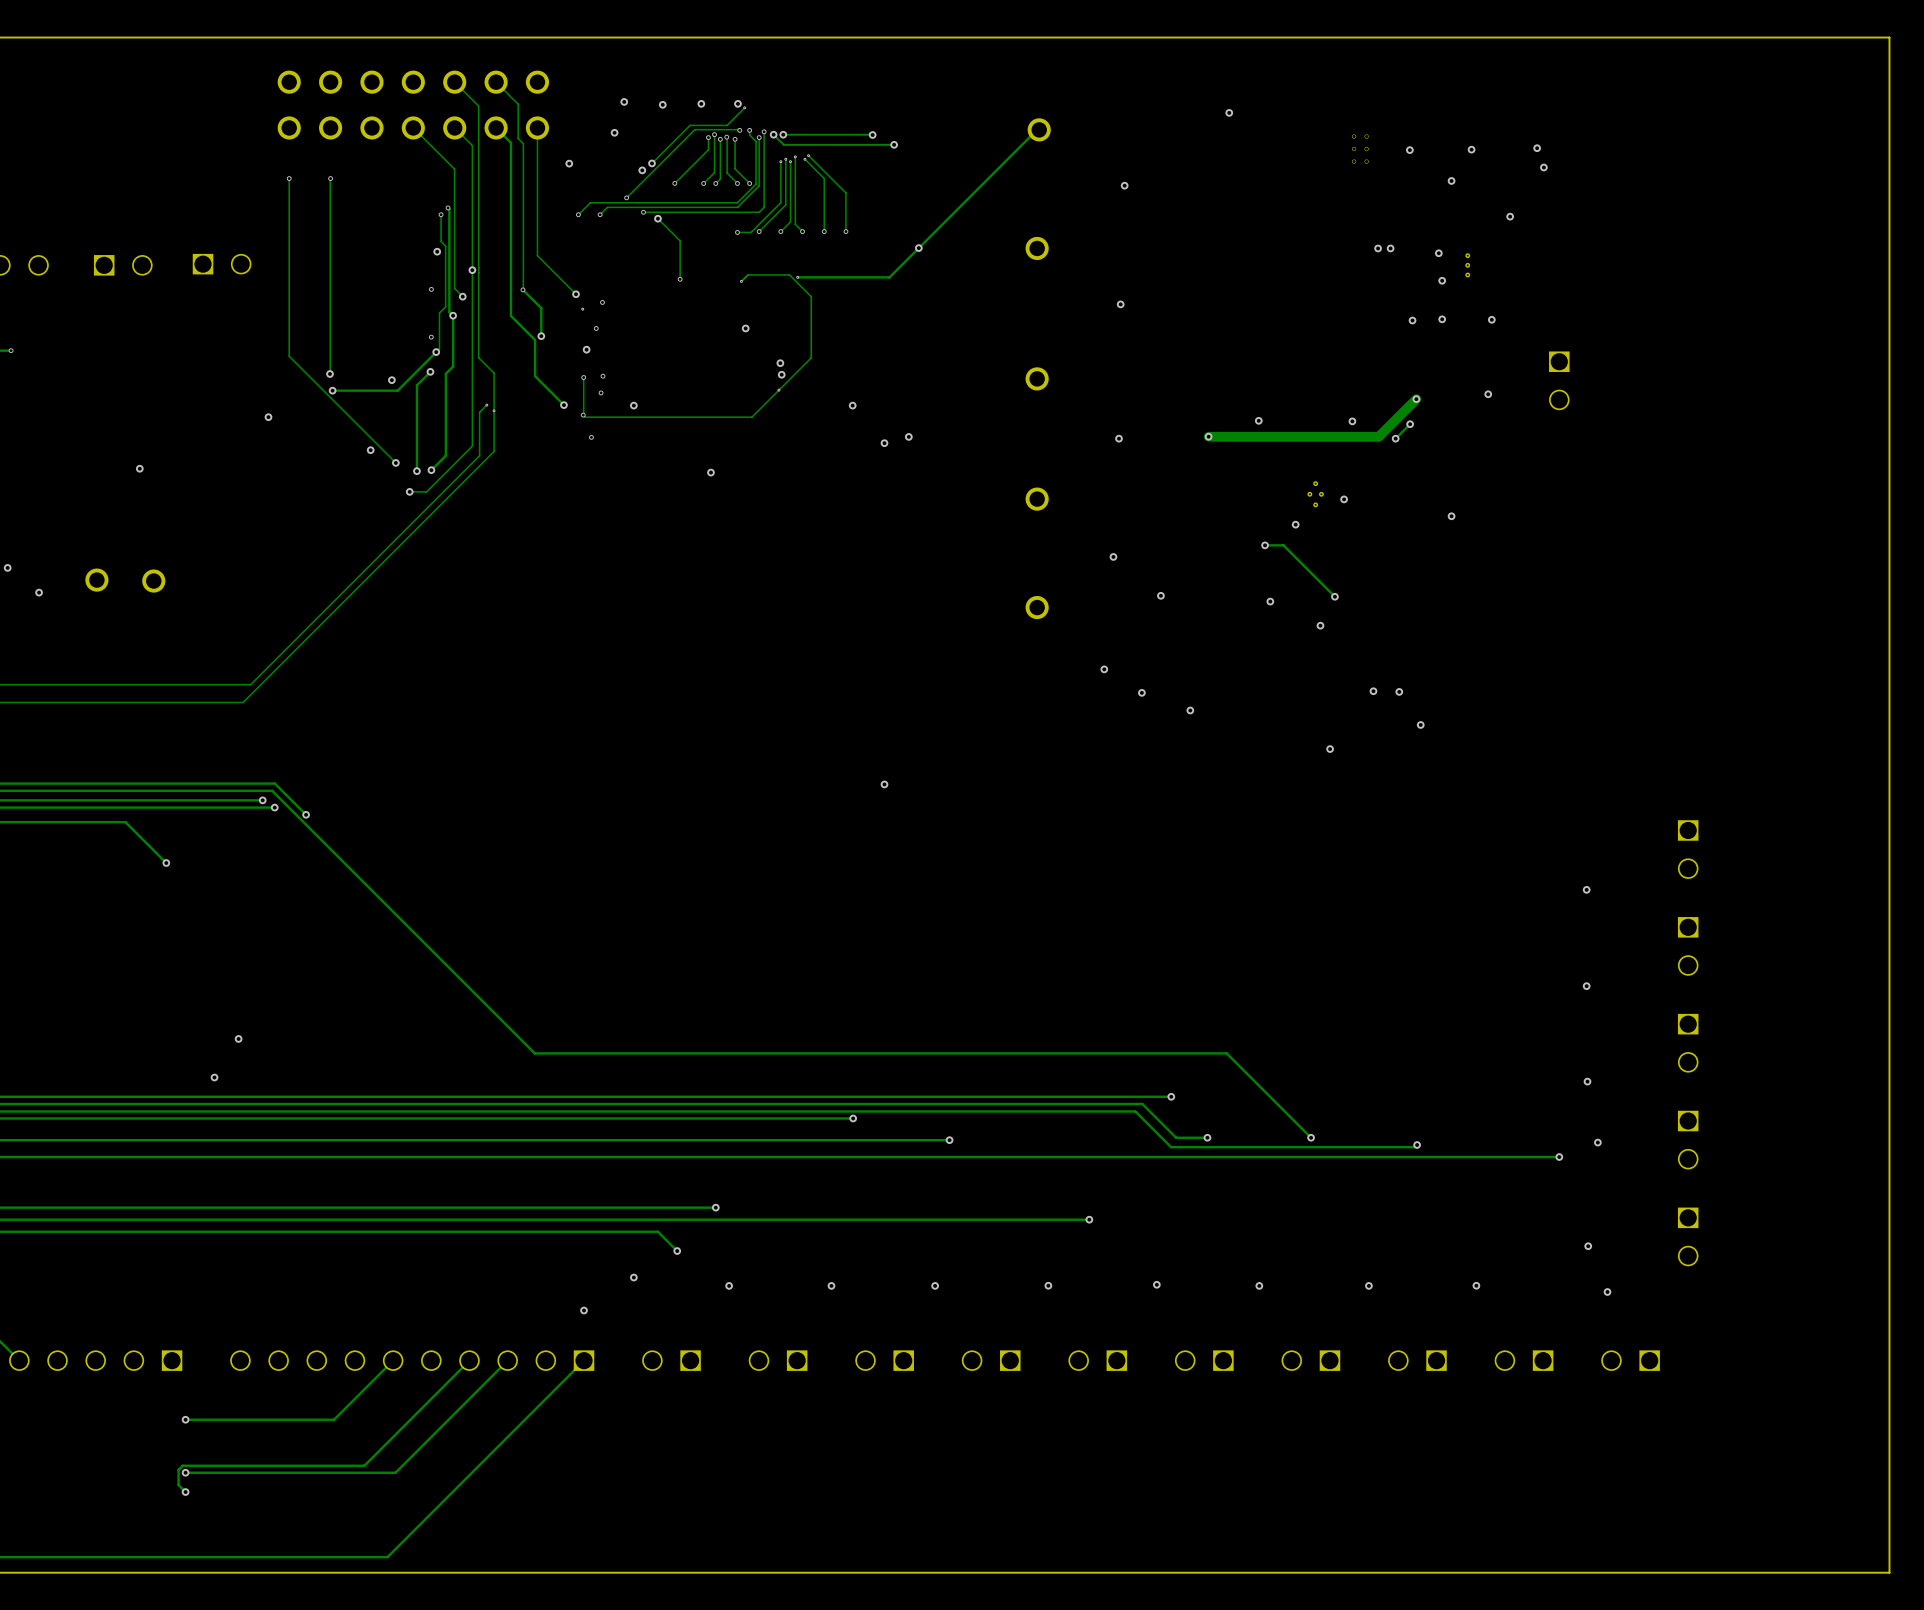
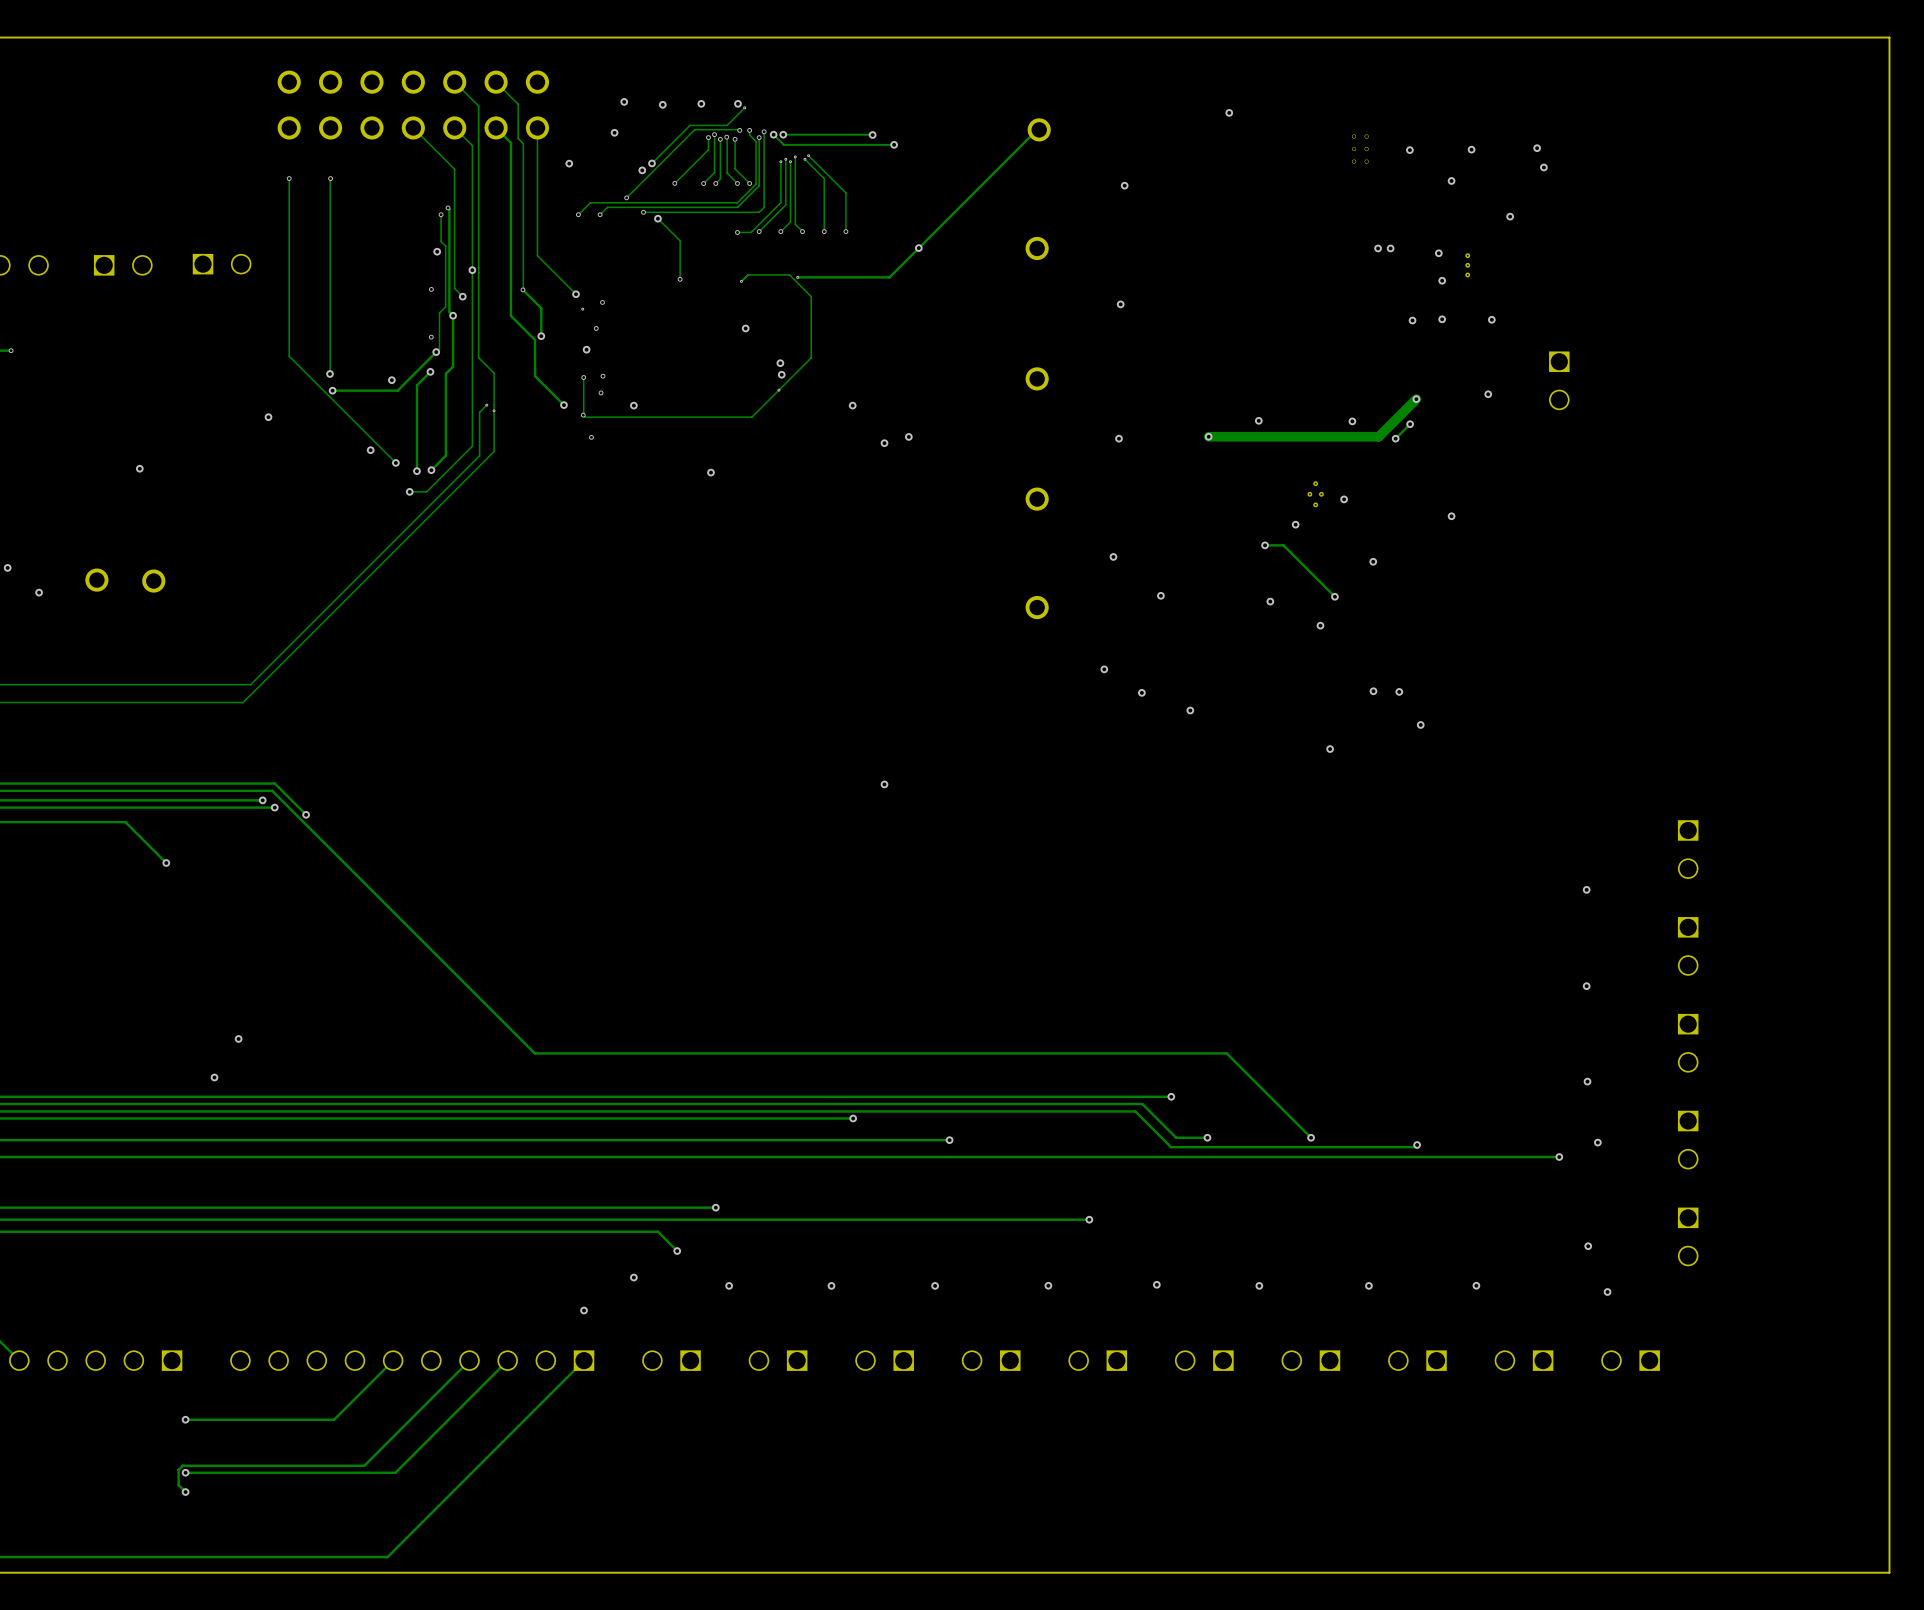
via: none -> (1373, 561)

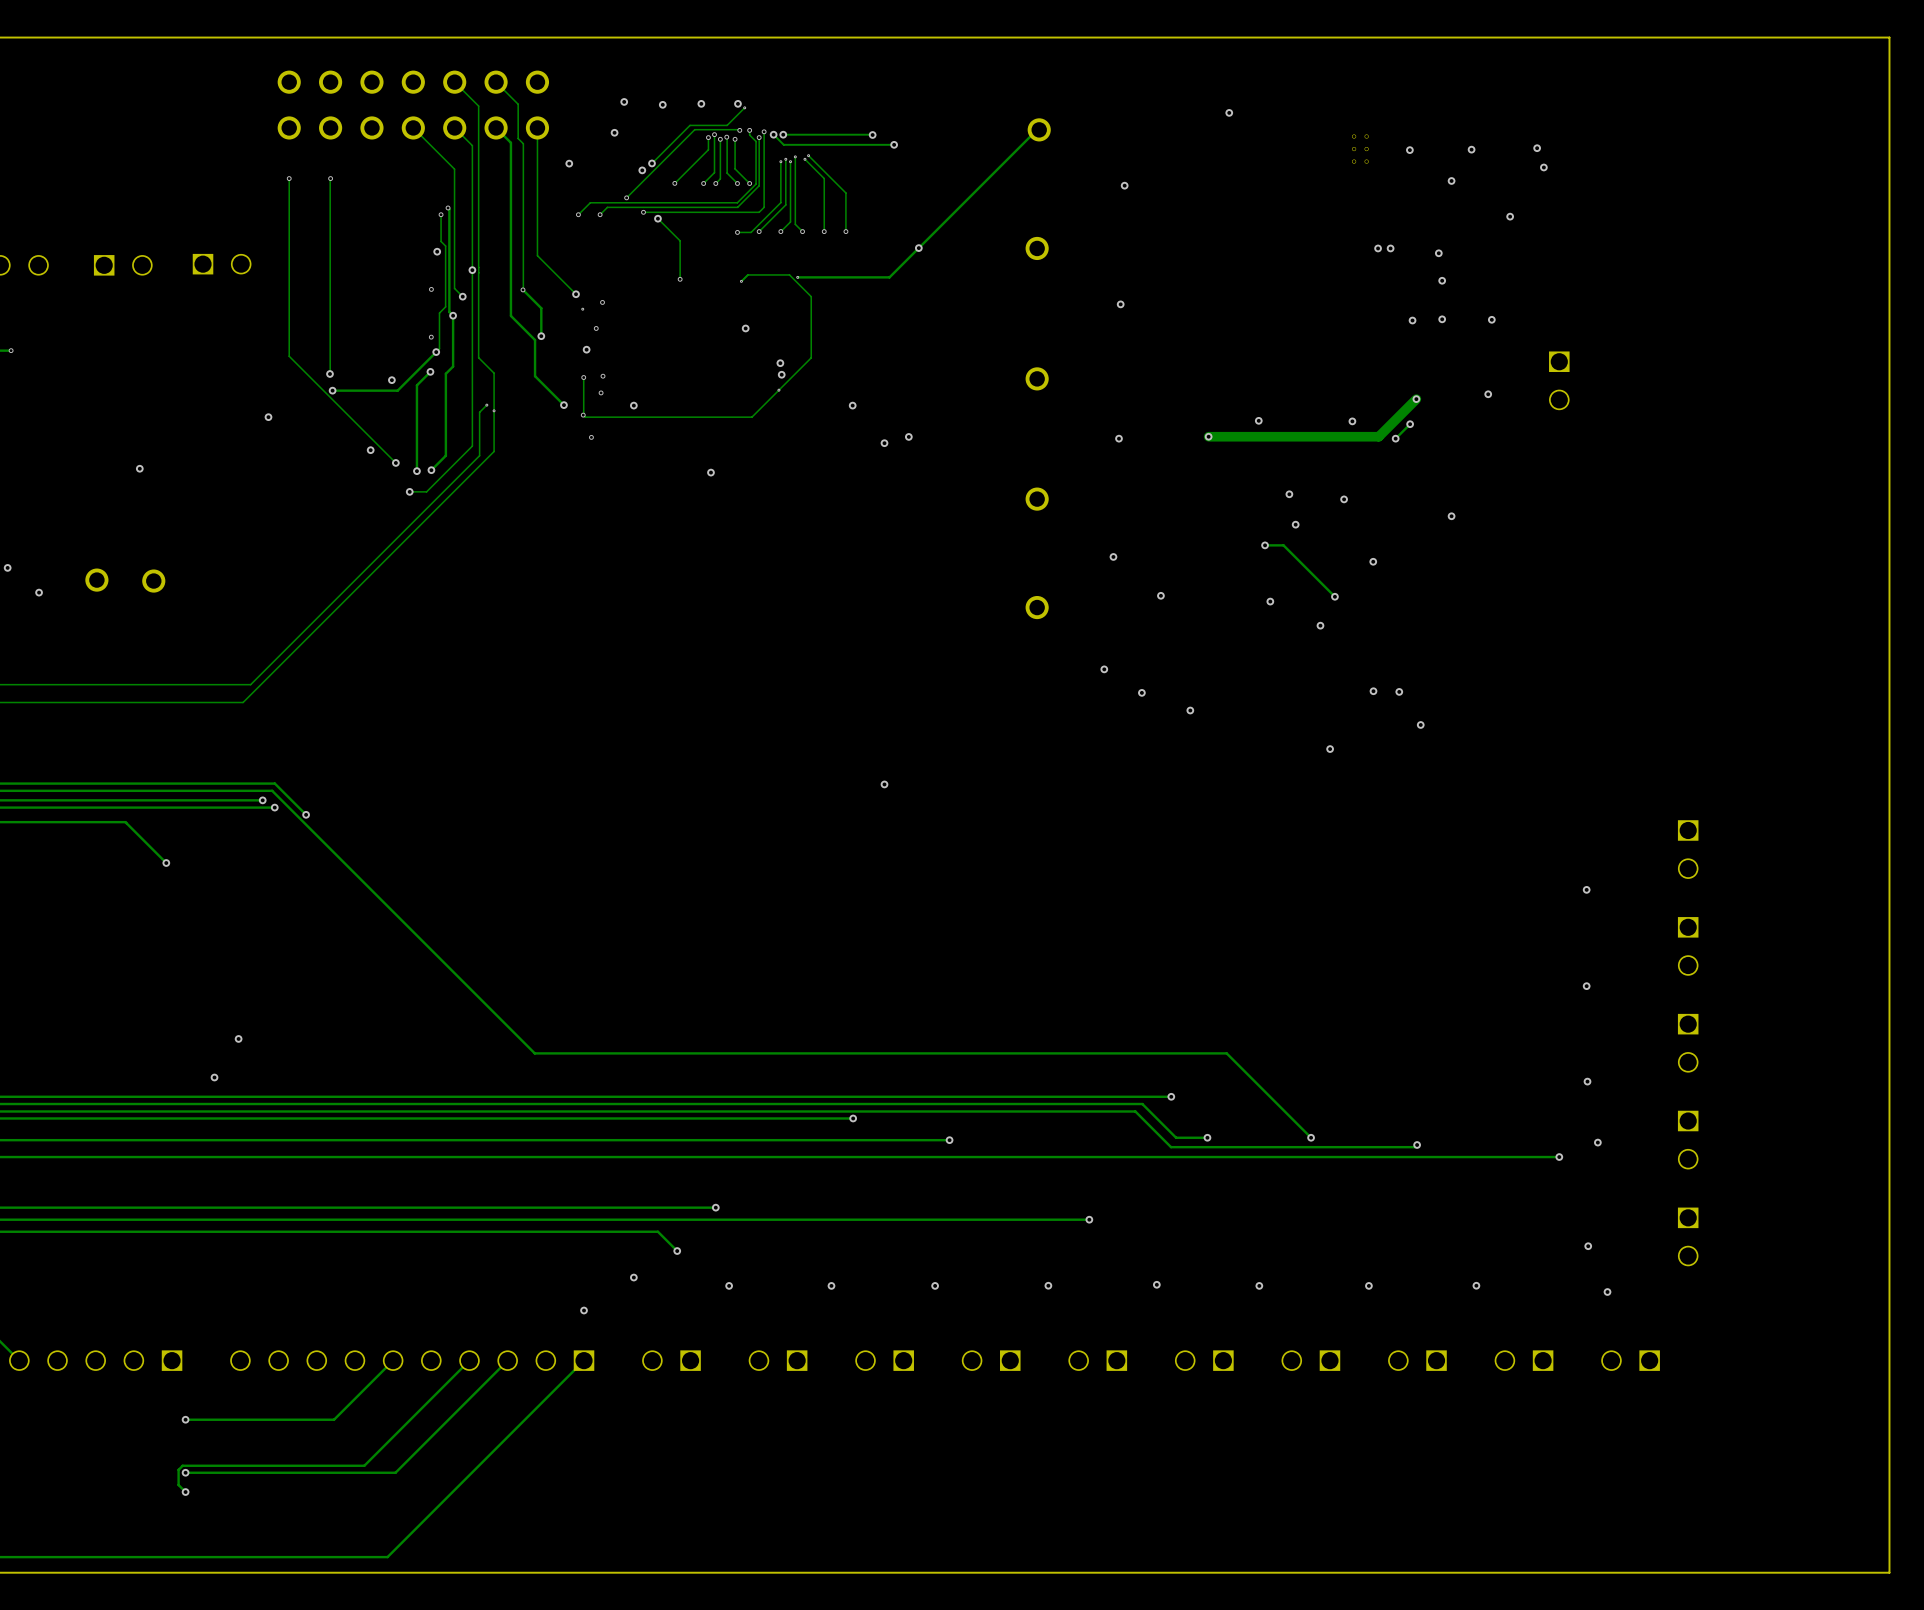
part: (1467, 265) -> none
via: none -> (1289, 494)
part: (1315, 494) -> none

